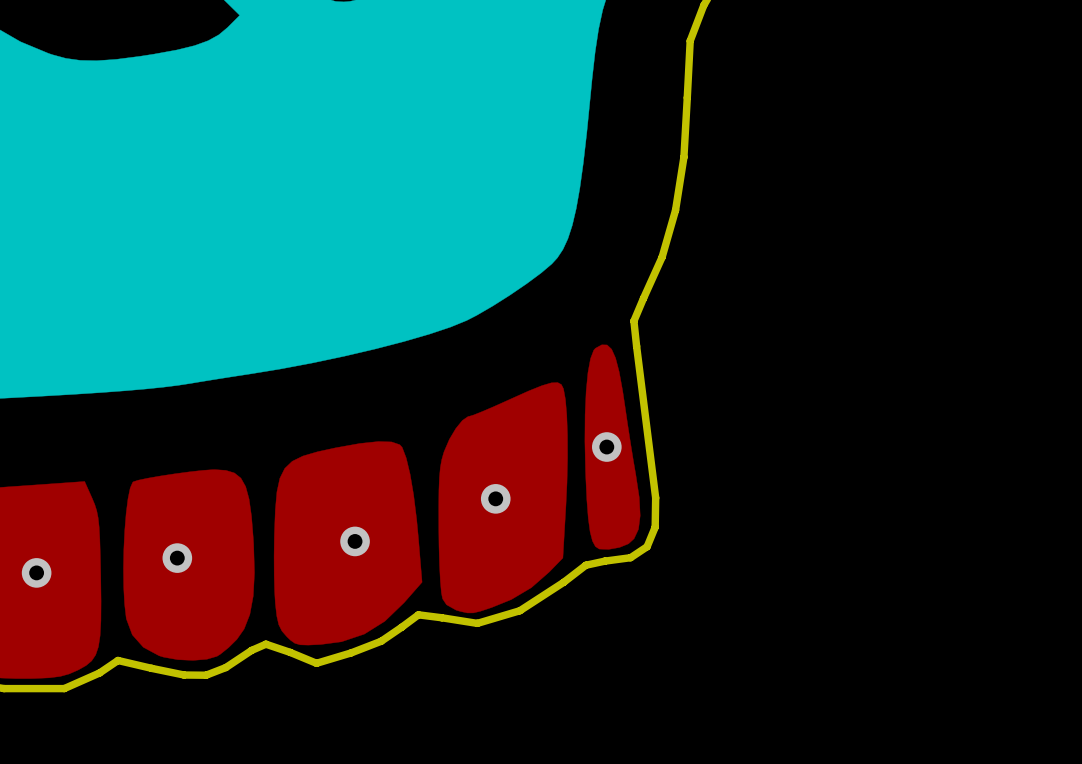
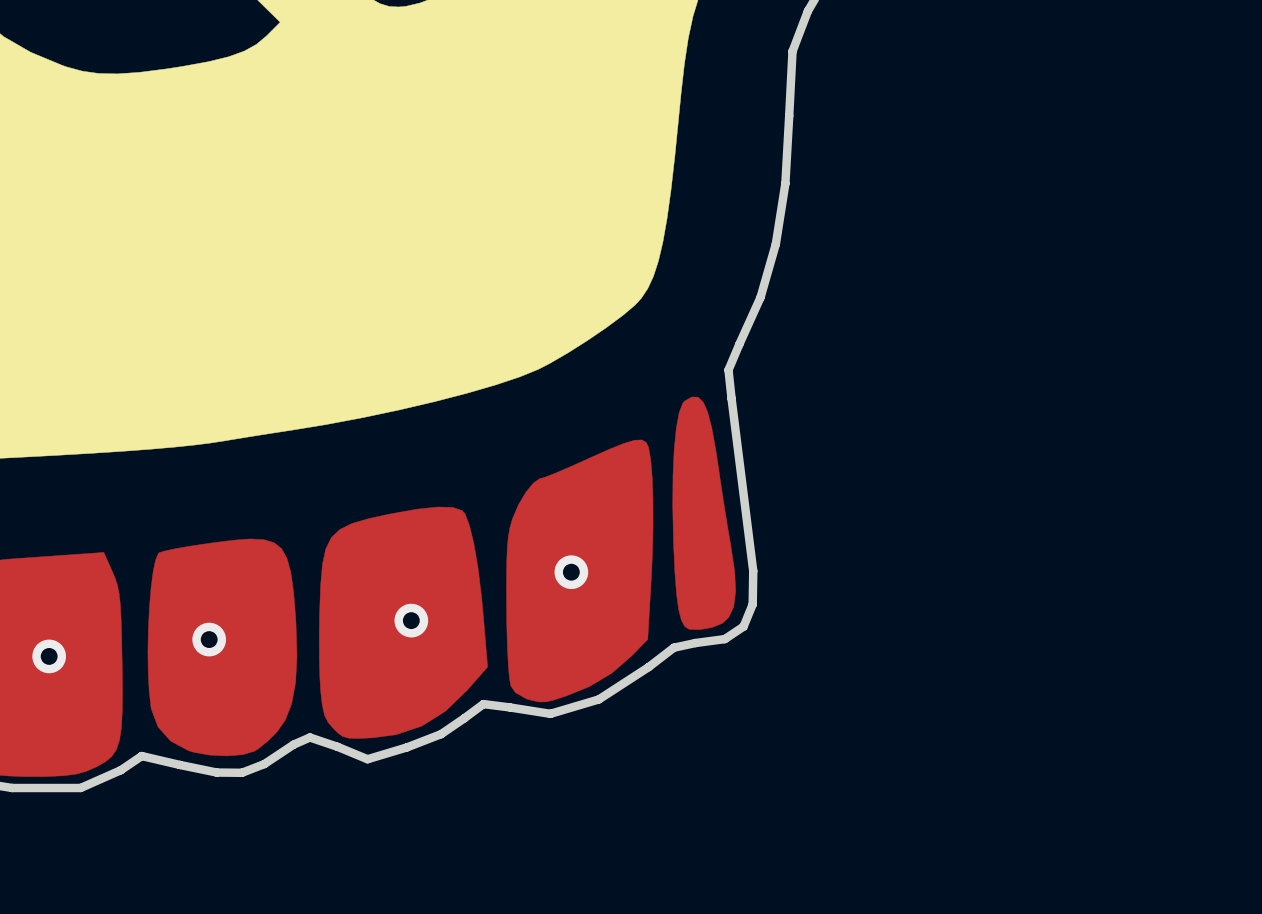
via: (606, 447) -> none

